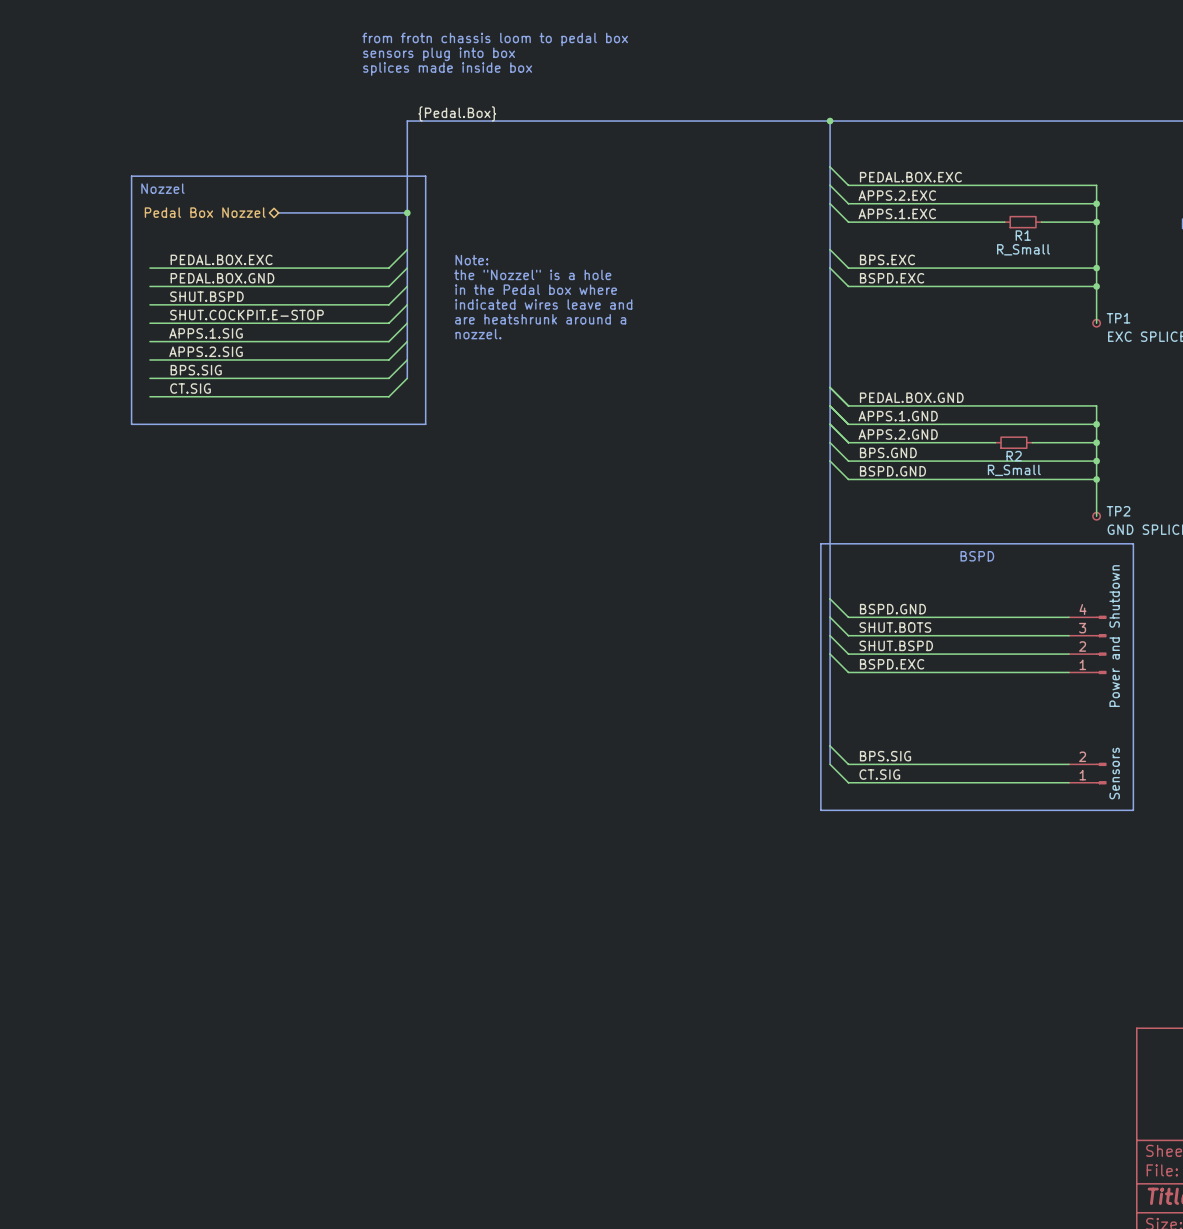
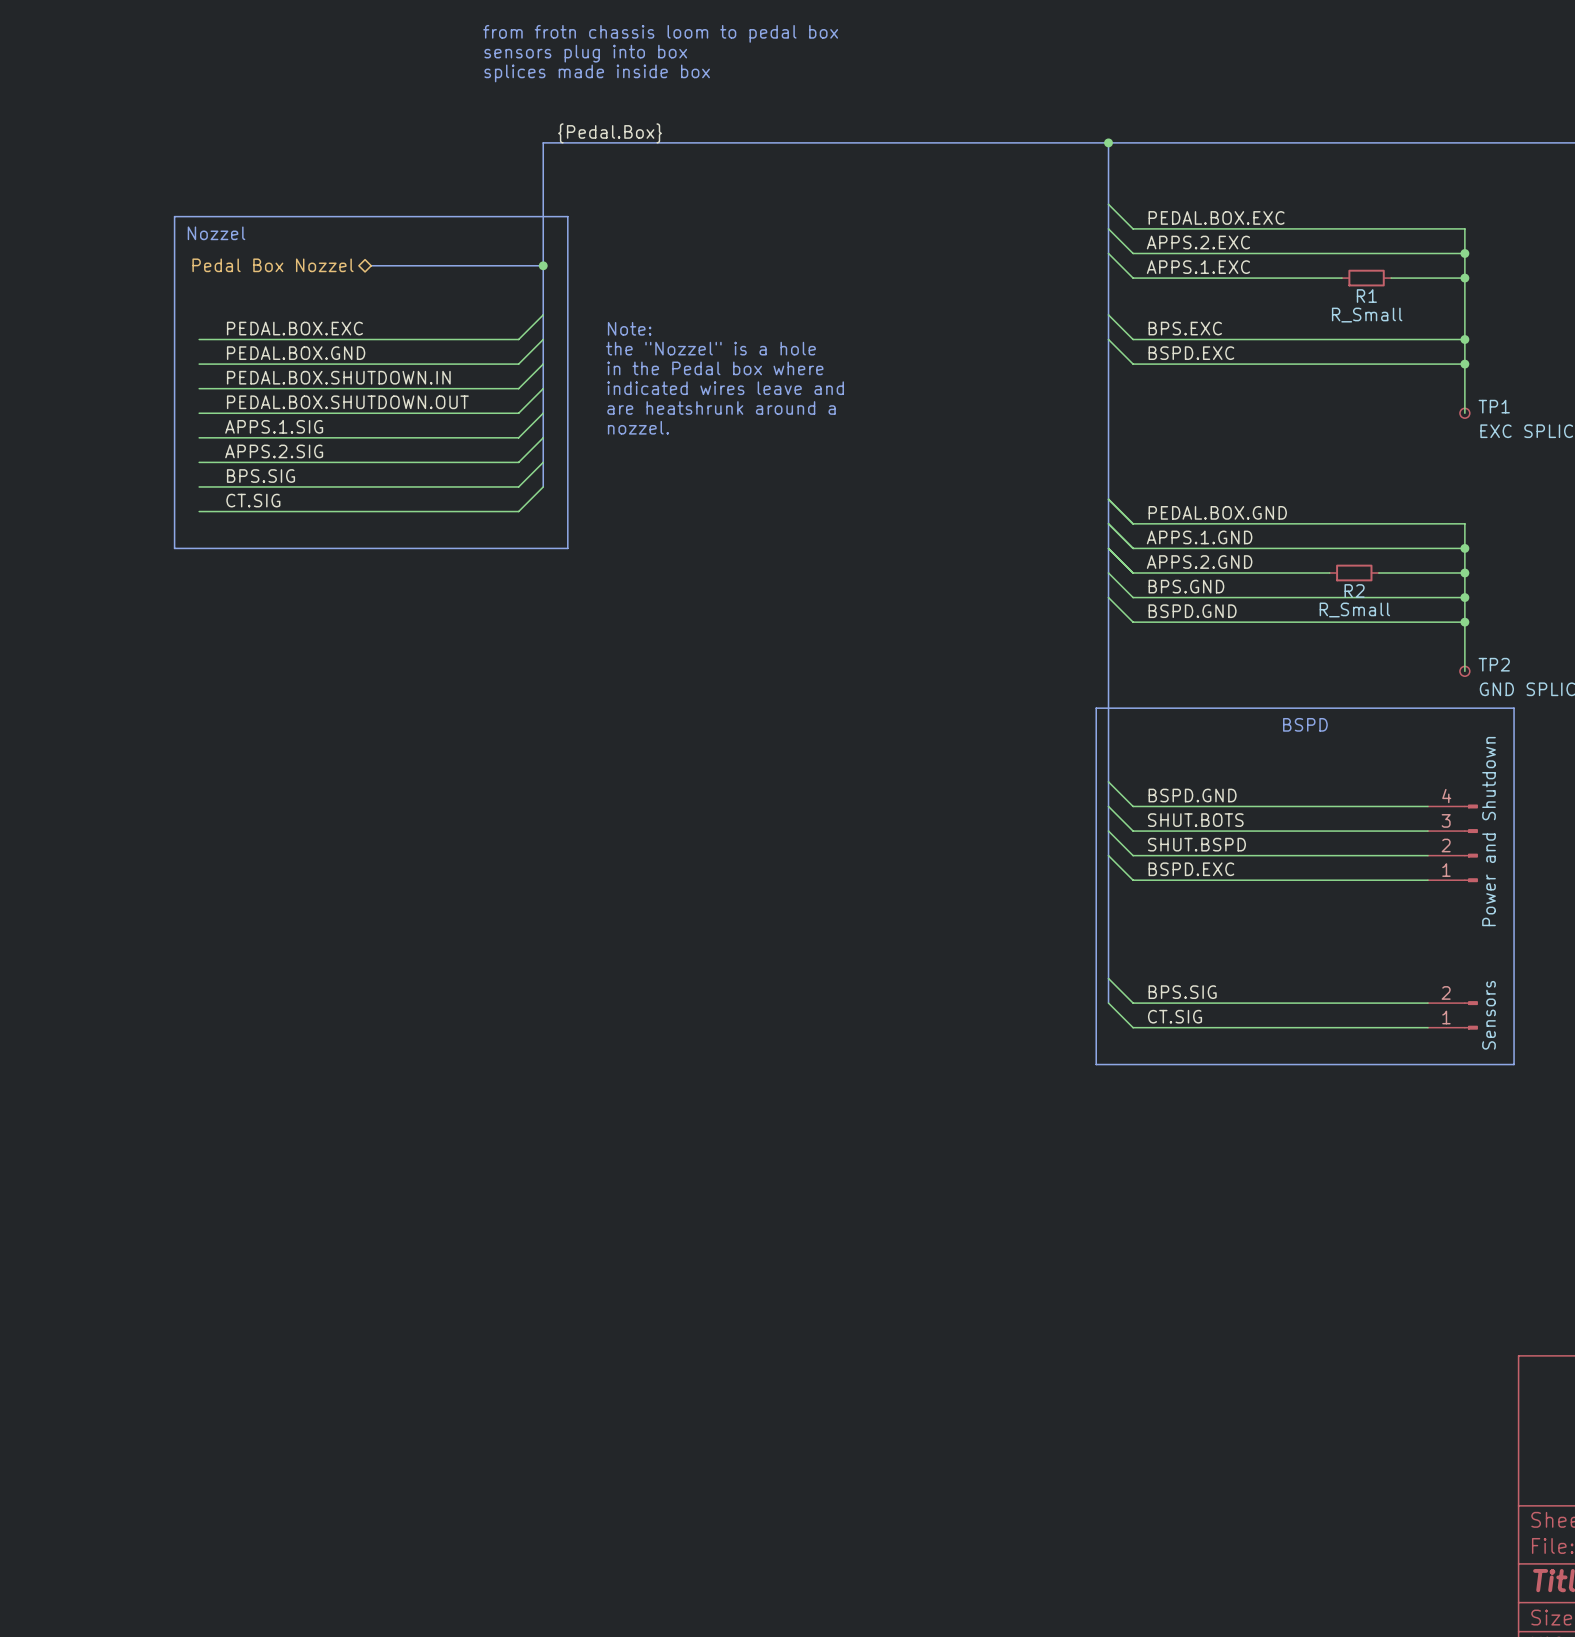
label: SHUT.BSPD (206, 296) -> PEDAL.BOX.SHUTDOWN.IN (338, 377)
label: SHUT.COCKPIT.E-STOP (246, 315) -> PEDAL.BOX.SHUTDOWN.OUT (347, 402)

